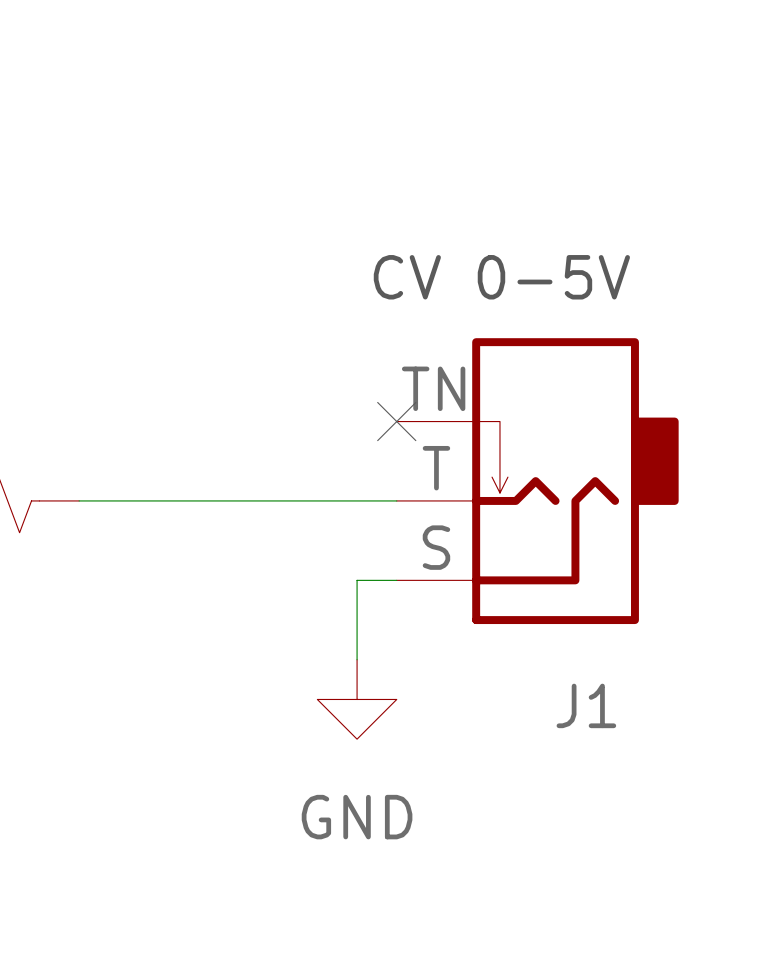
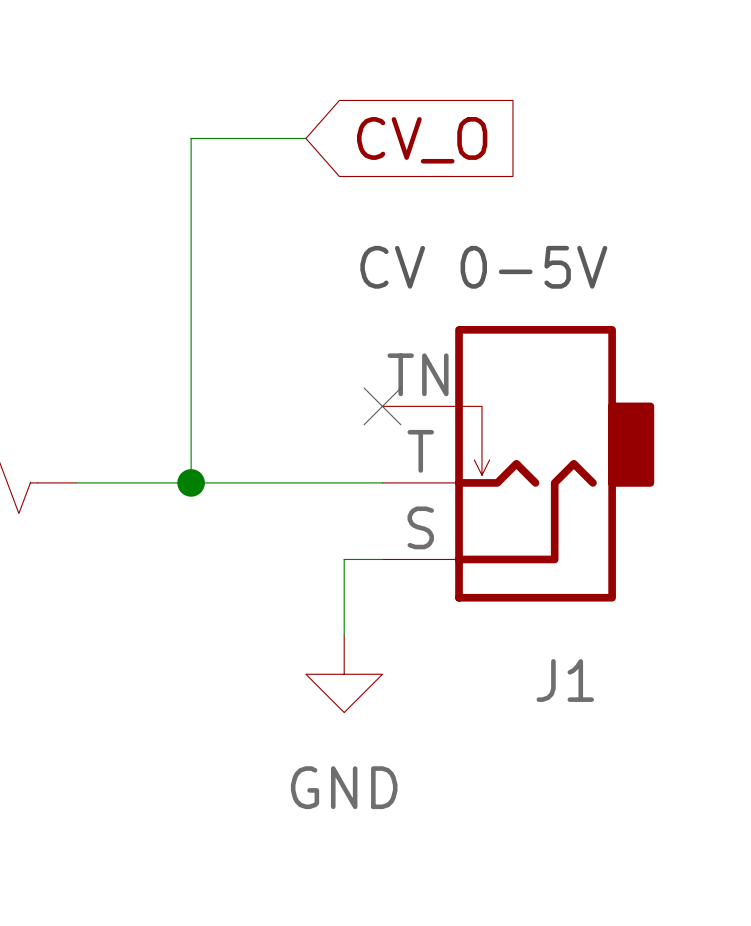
wire: none -> (305, 138) (191, 138) (191, 482)
global label: none -> CV_O (422, 140)
junction: none -> (191, 482)

